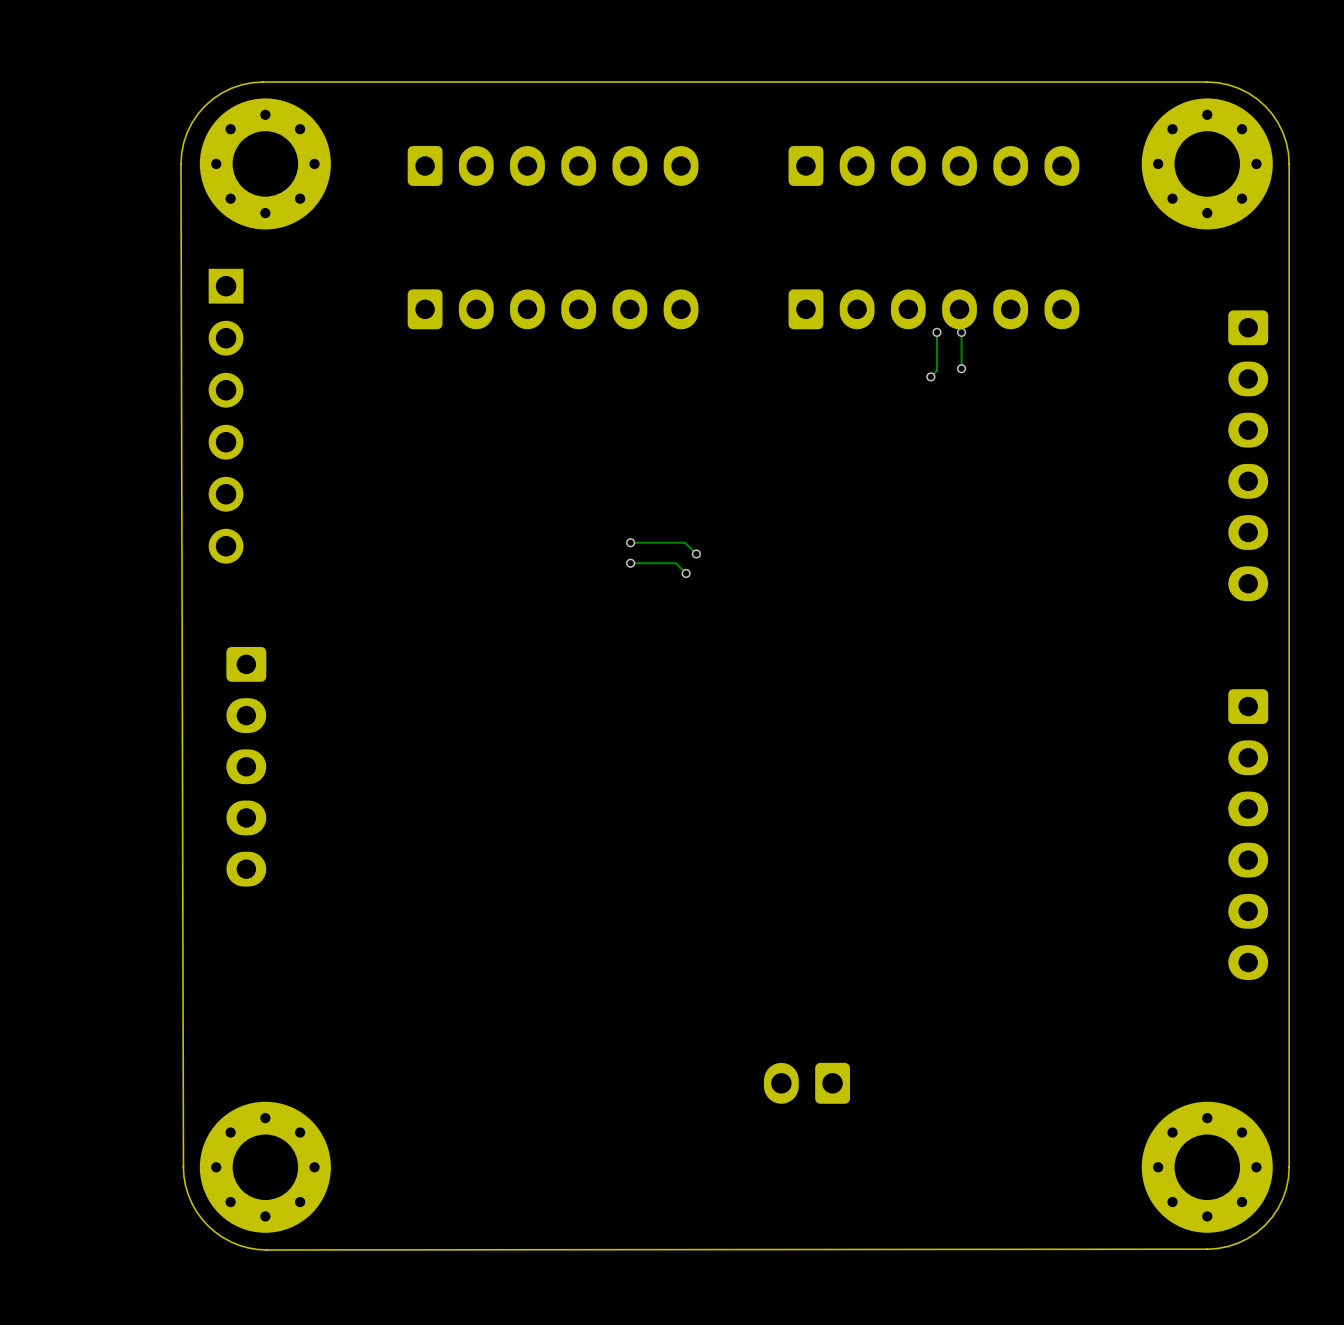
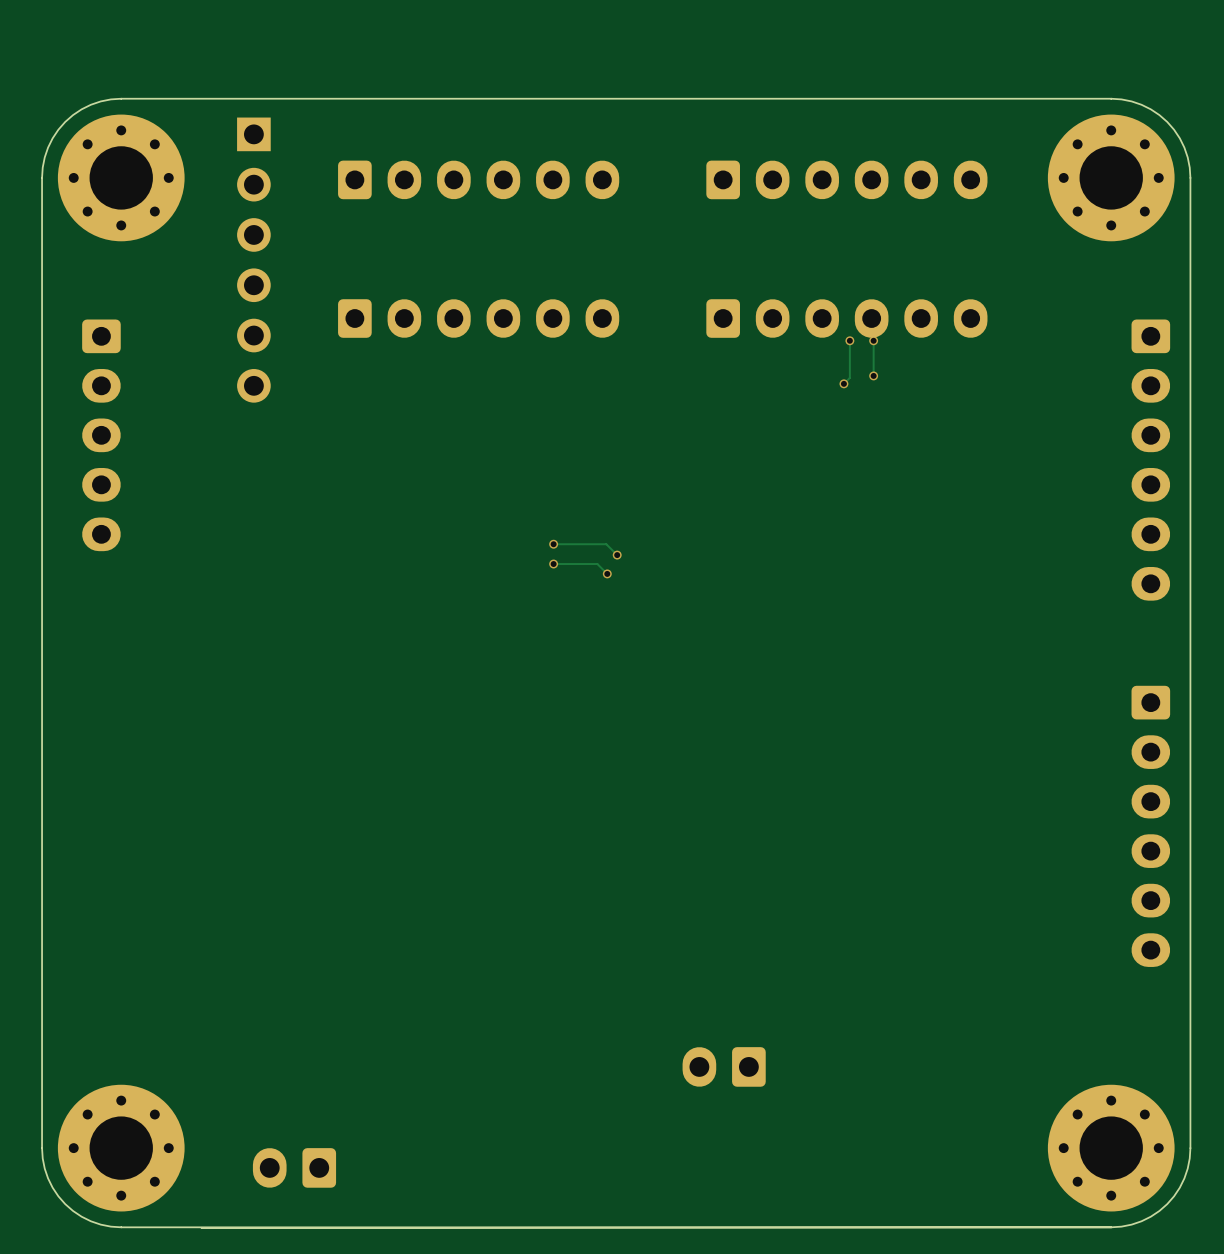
board edge: (262, 82) (231, 88) (204, 106) (187, 132) (181, 153) (183, 1167) -> (198, 98) (121, 98) (90, 104) (73, 115) (58, 129) (48, 147) (42, 167) (42, 1148) (44, 1168) (58, 1196) (73, 1210) (90, 1221) (121, 1227) (1111, 1227)
part position: (265, 163) -> (121, 177)
part position: (226, 416) -> (253, 260)
part position: (246, 766) -> (101, 435)
board edge: (183, 1166) (185, 1185) (191, 1202) (207, 1225) (222, 1237) (239, 1245) (266, 1250) -> none
part position: (265, 1167) -> (121, 1148)
part: none -> (294, 1167)

